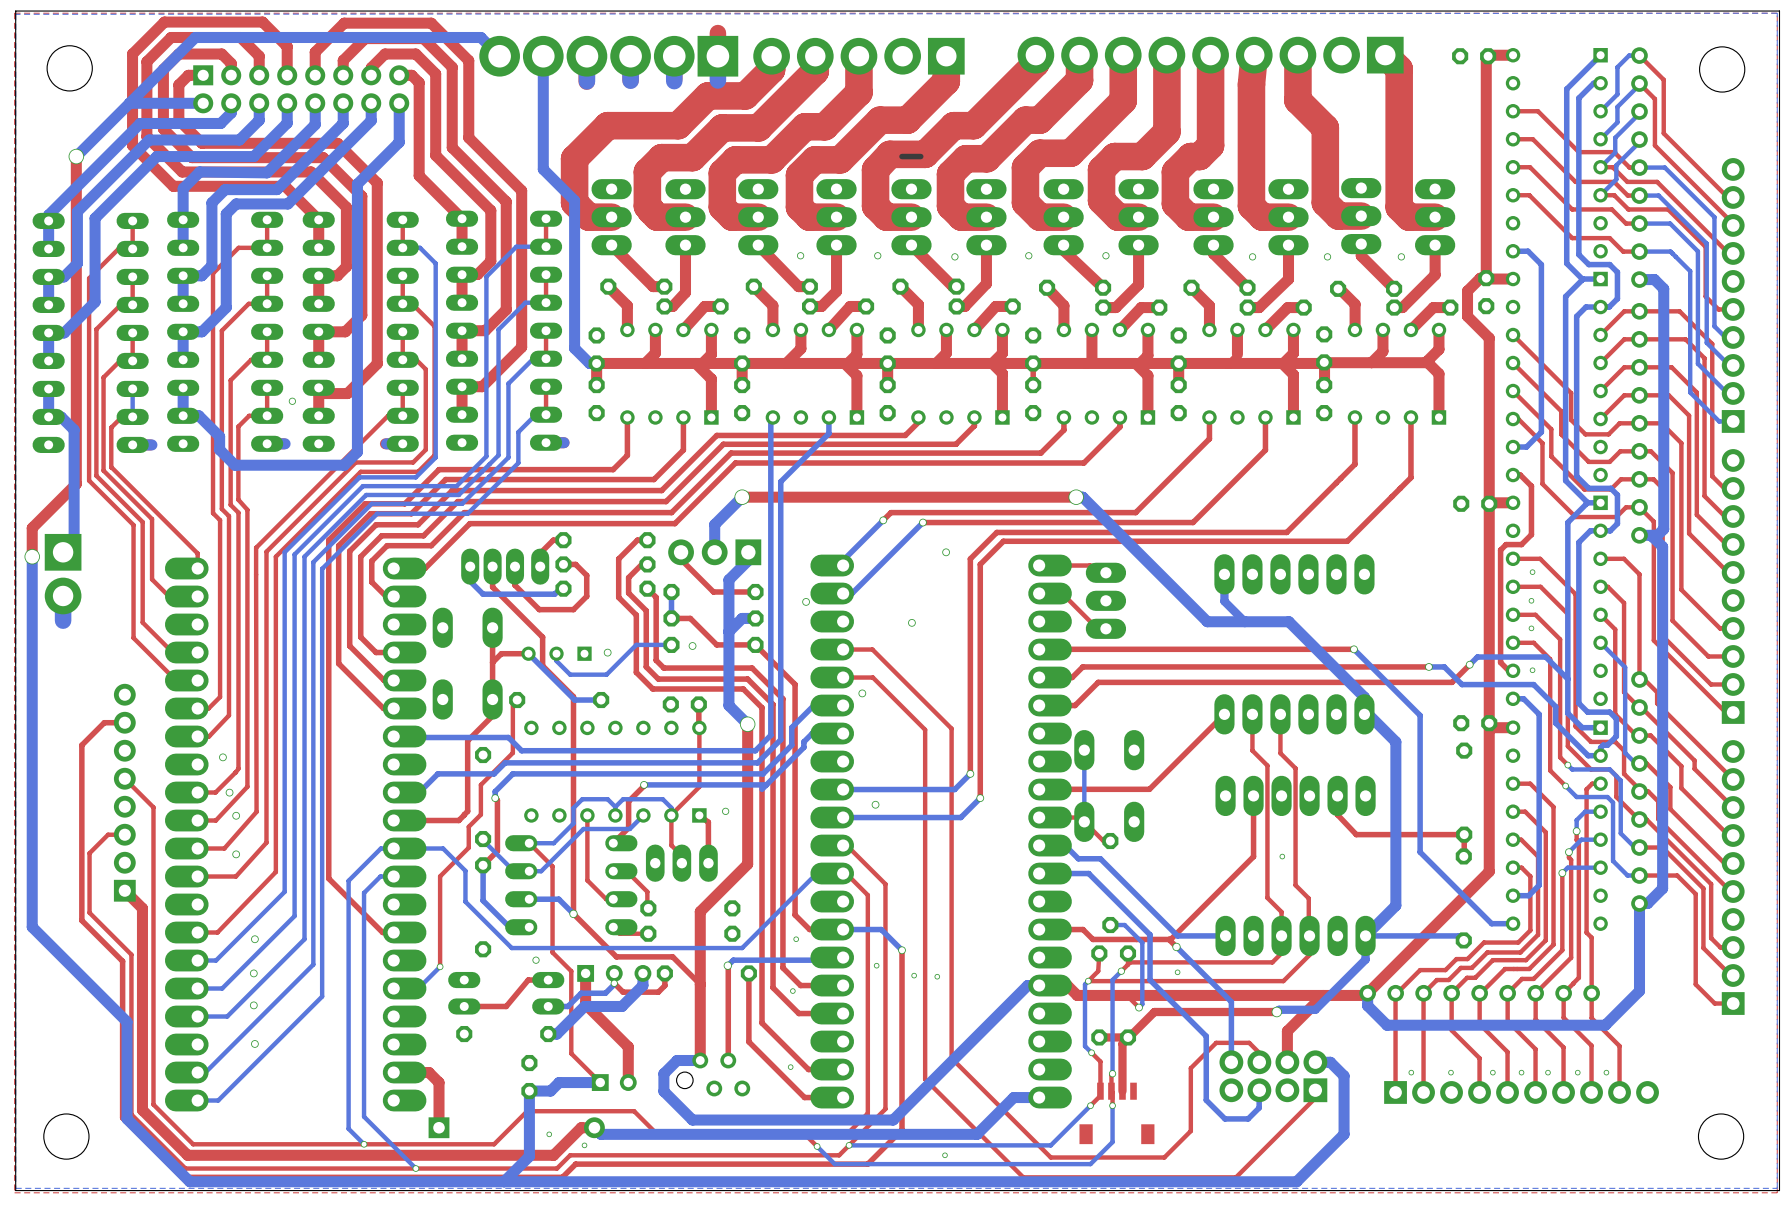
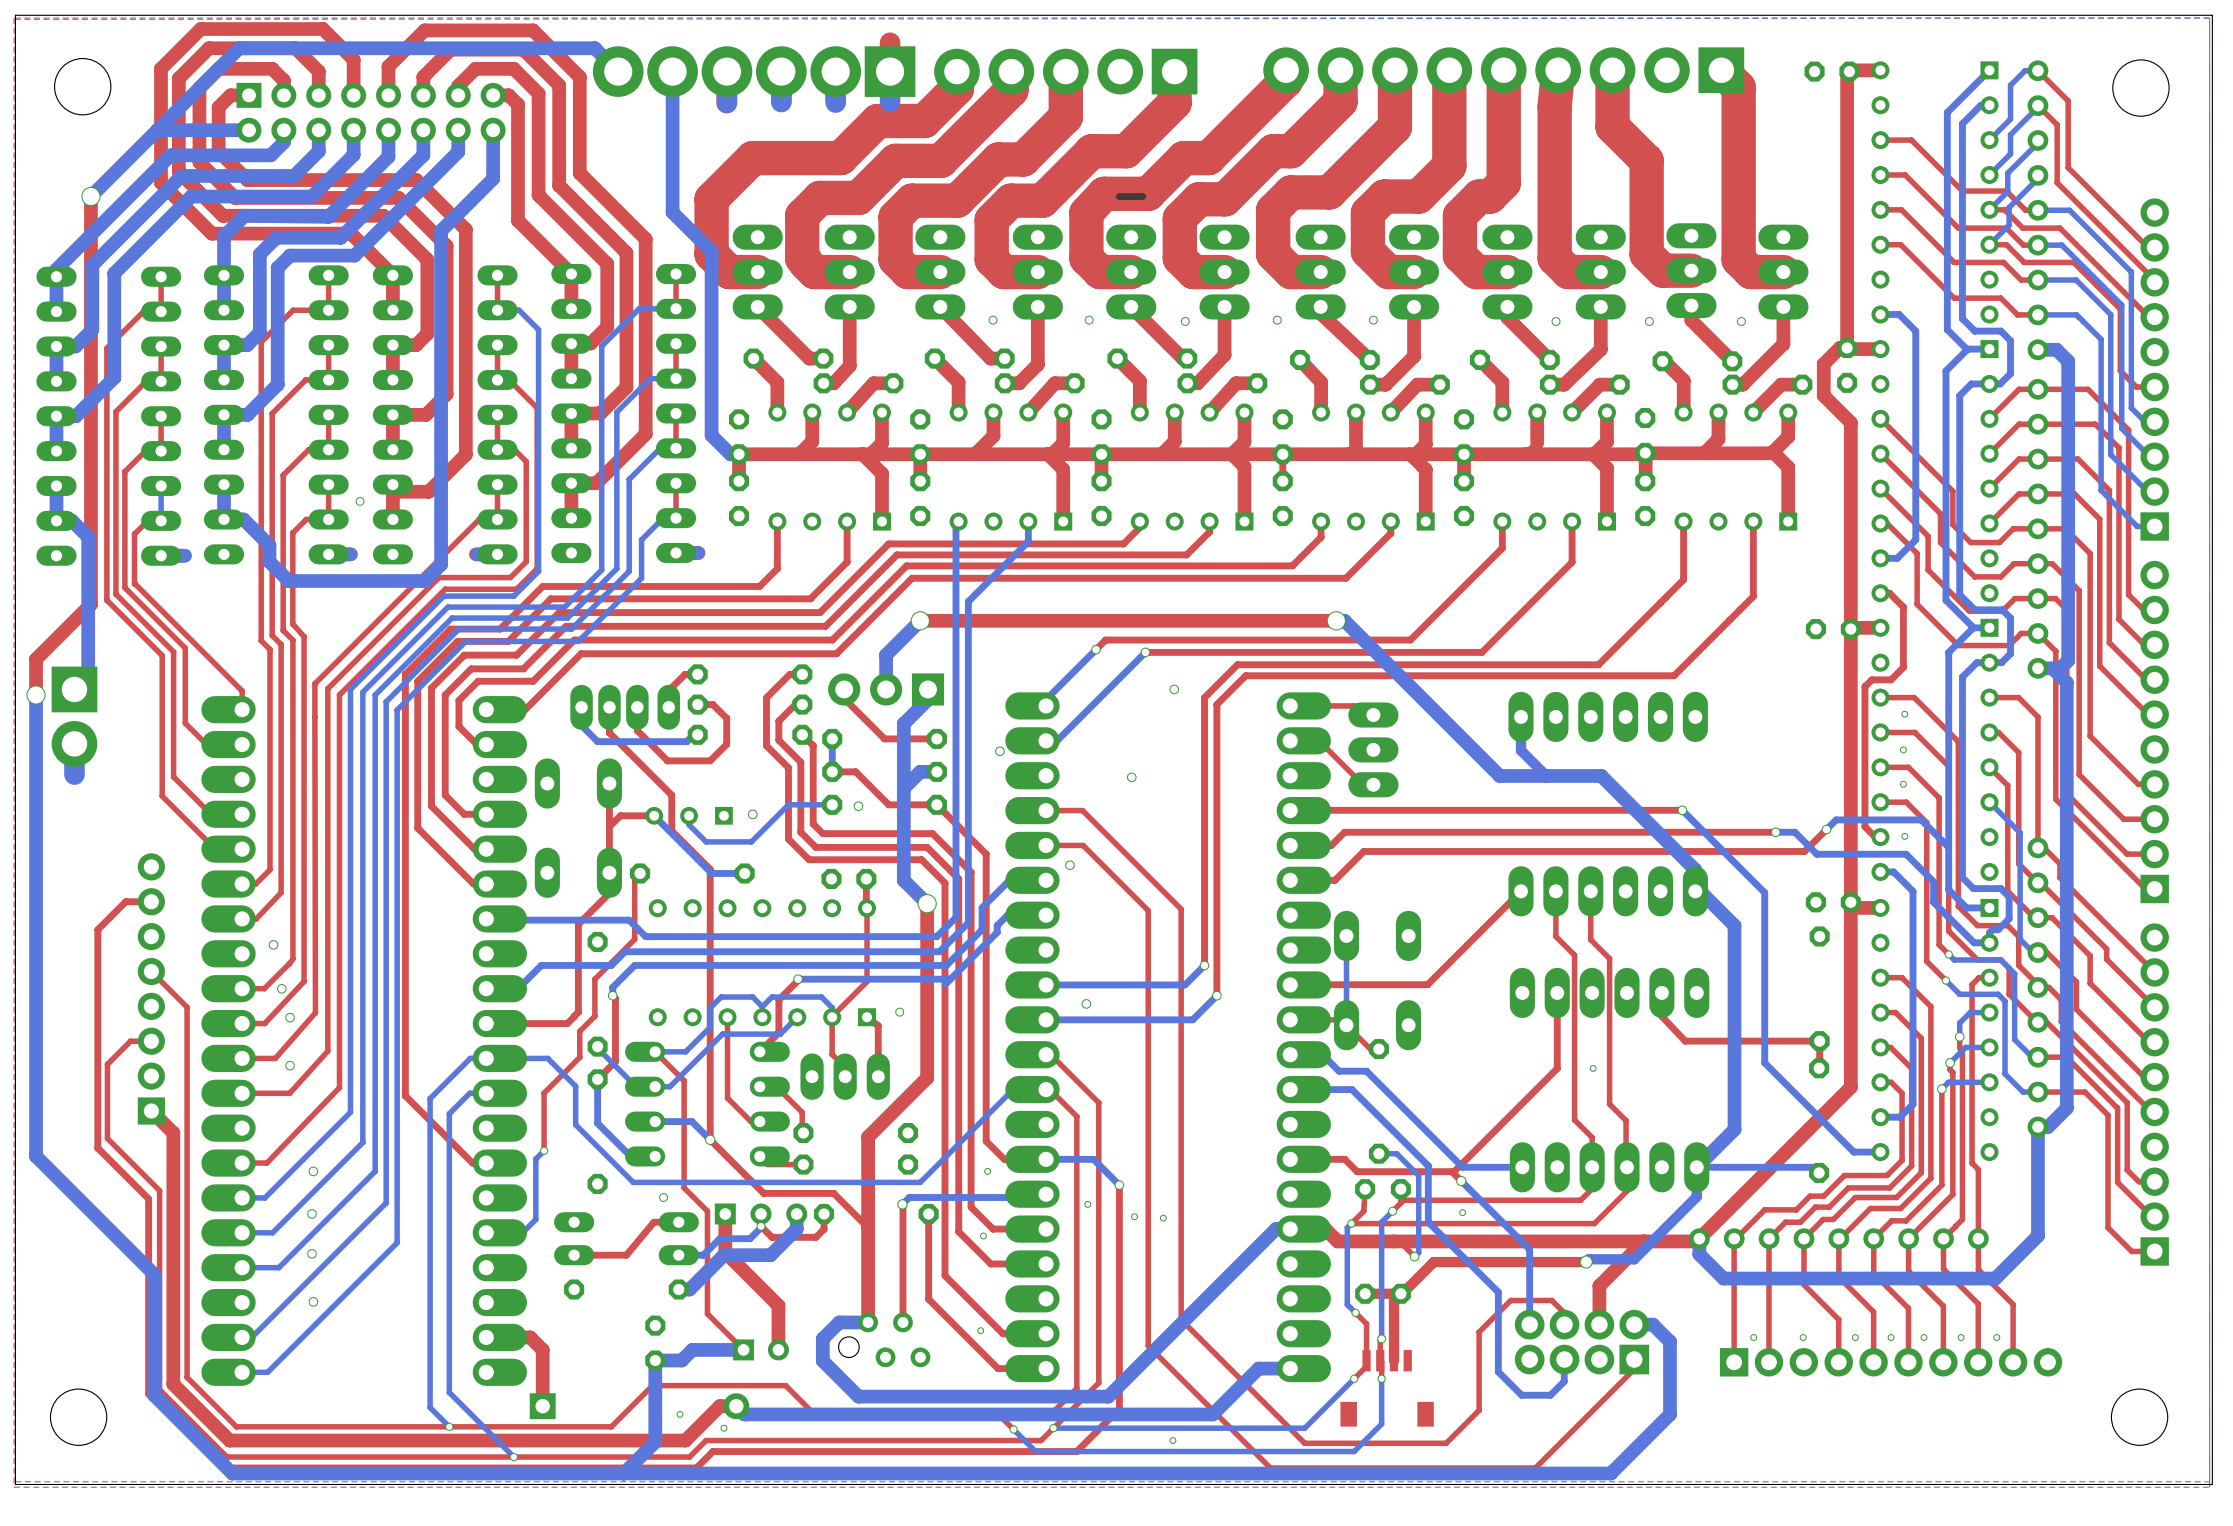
top track: (440, 922) (440, 966) -> none
bottom track: (440, 966) (418, 988) -> (544, 1150) (535, 1159) (535, 1219) (522, 1232) (517, 1232)
via position: (440, 966) -> (544, 1150)

